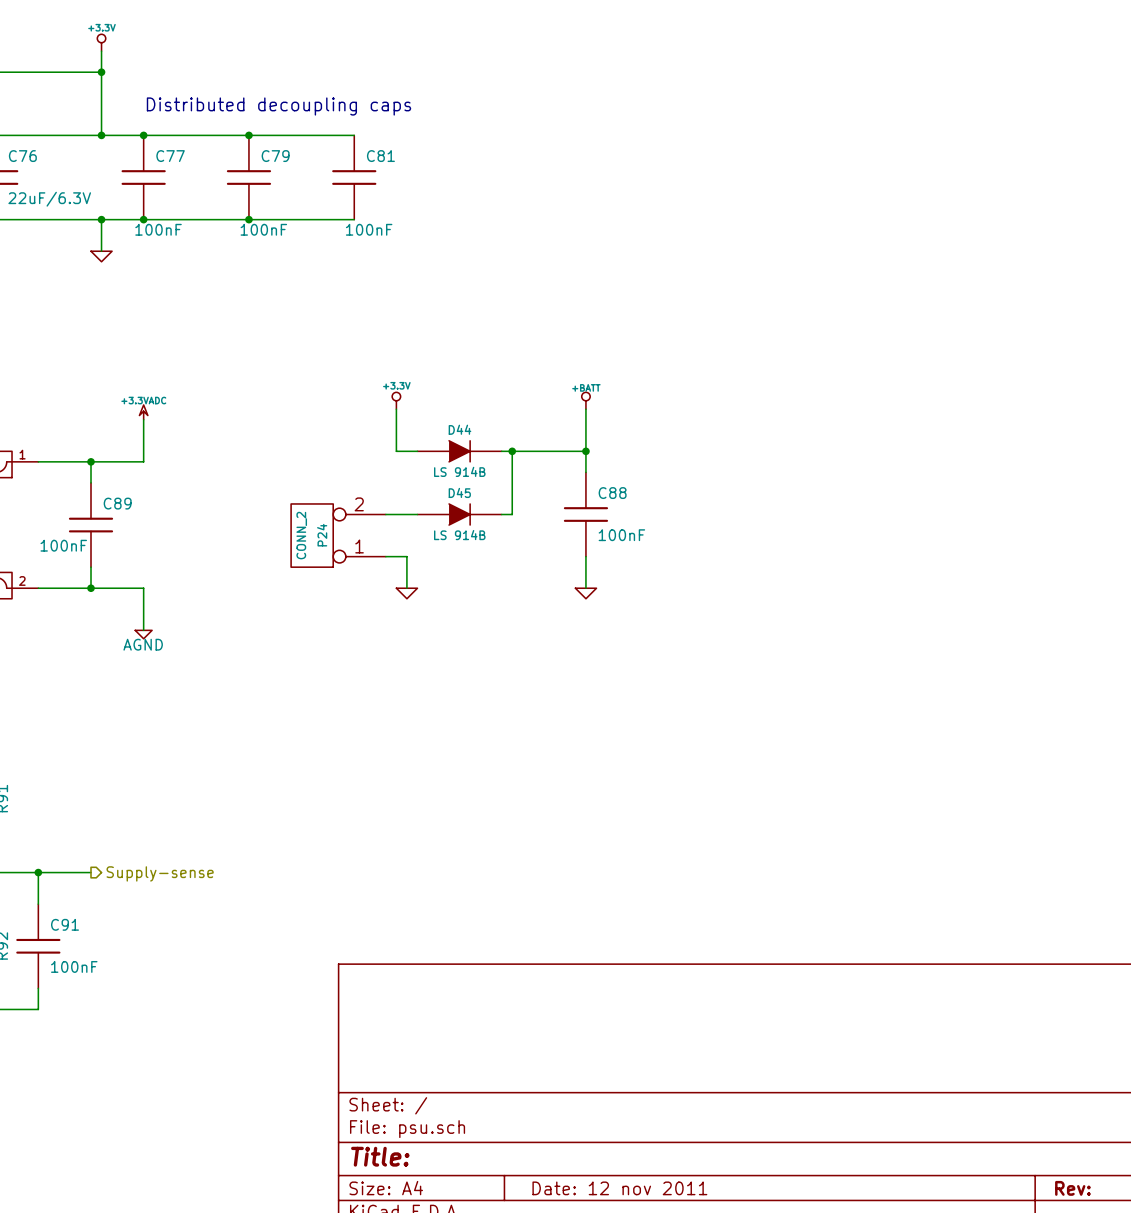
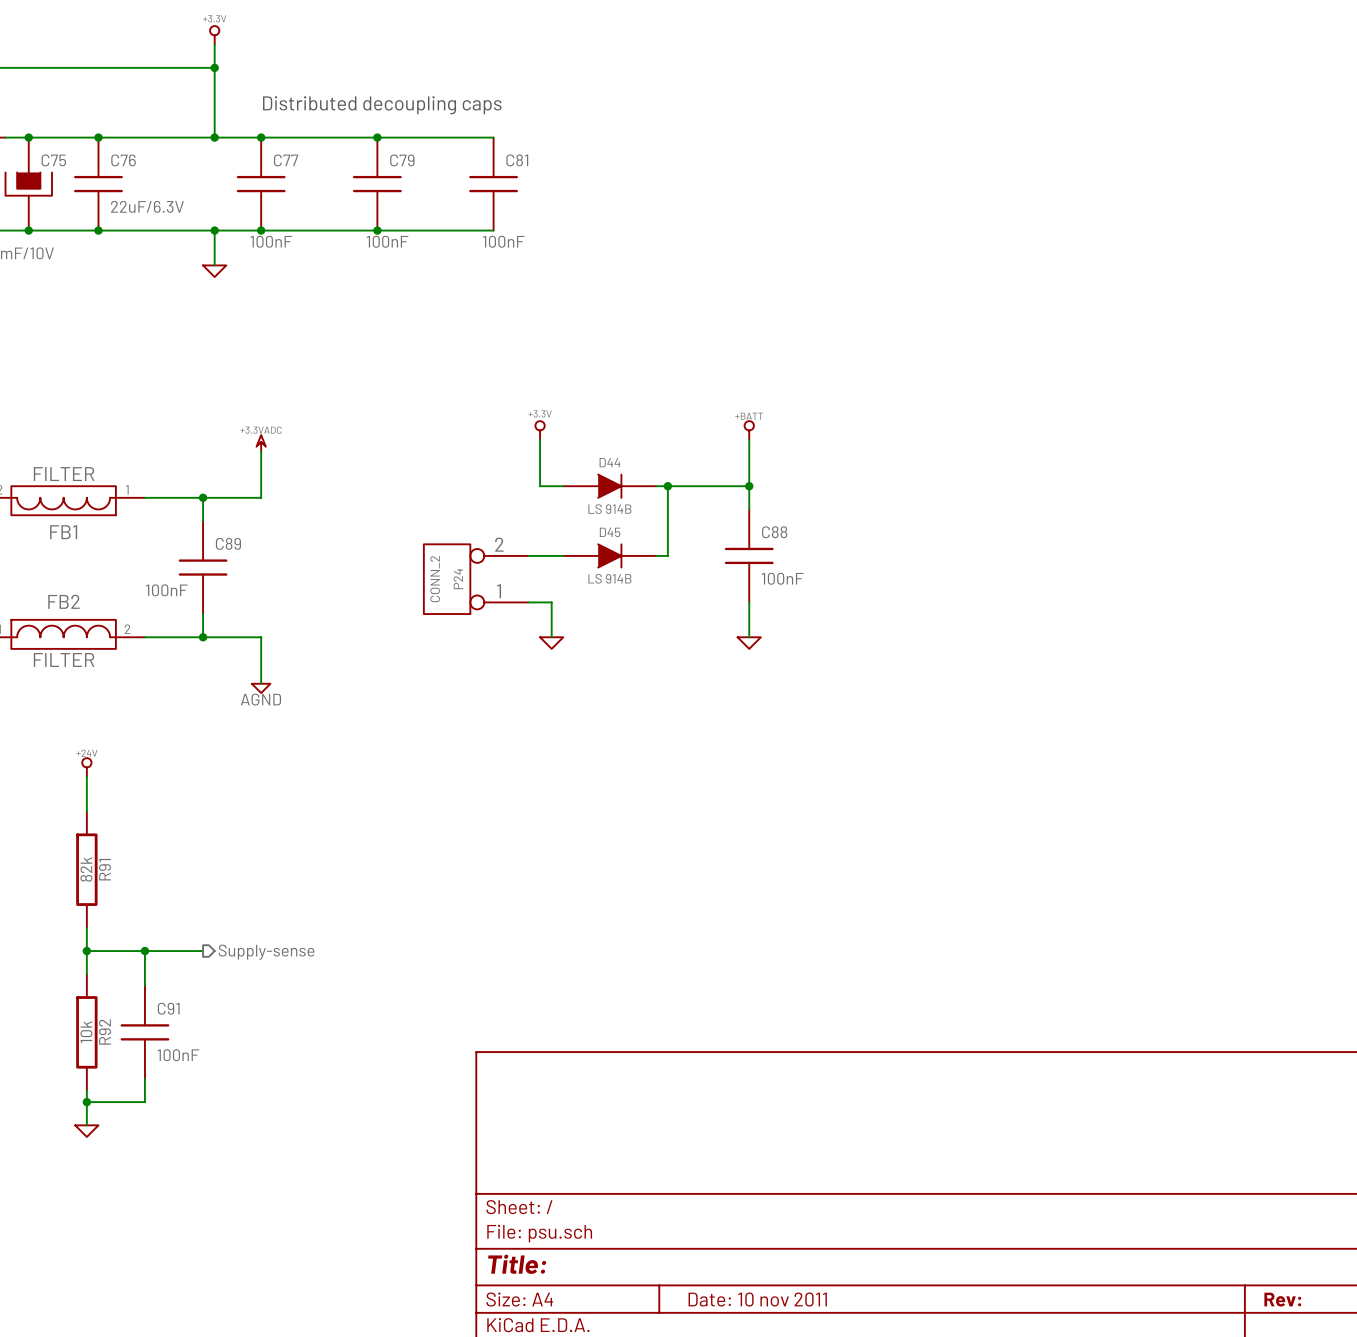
title block: Date: 12 nov 2011 (619, 1188) -> Date: 10 nov 2011 (757, 1299)

